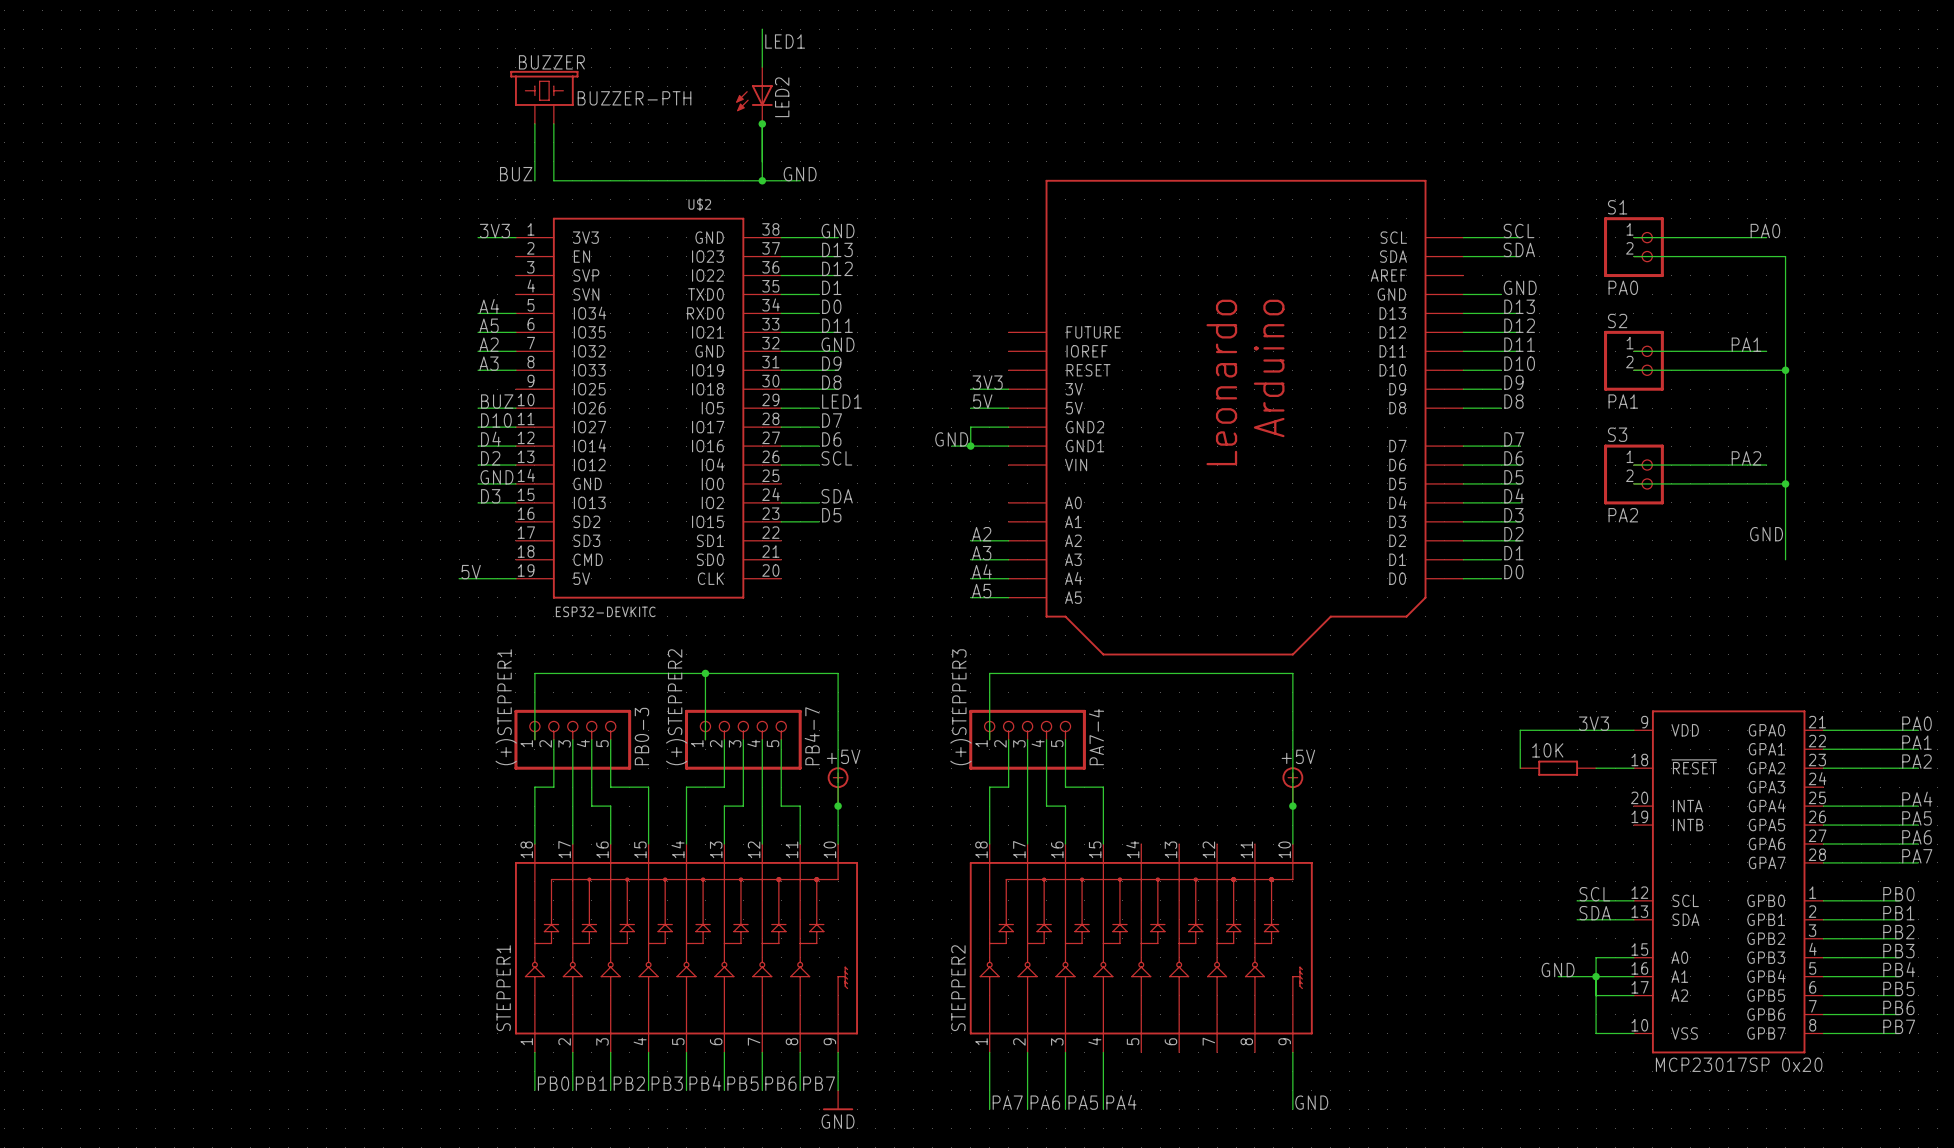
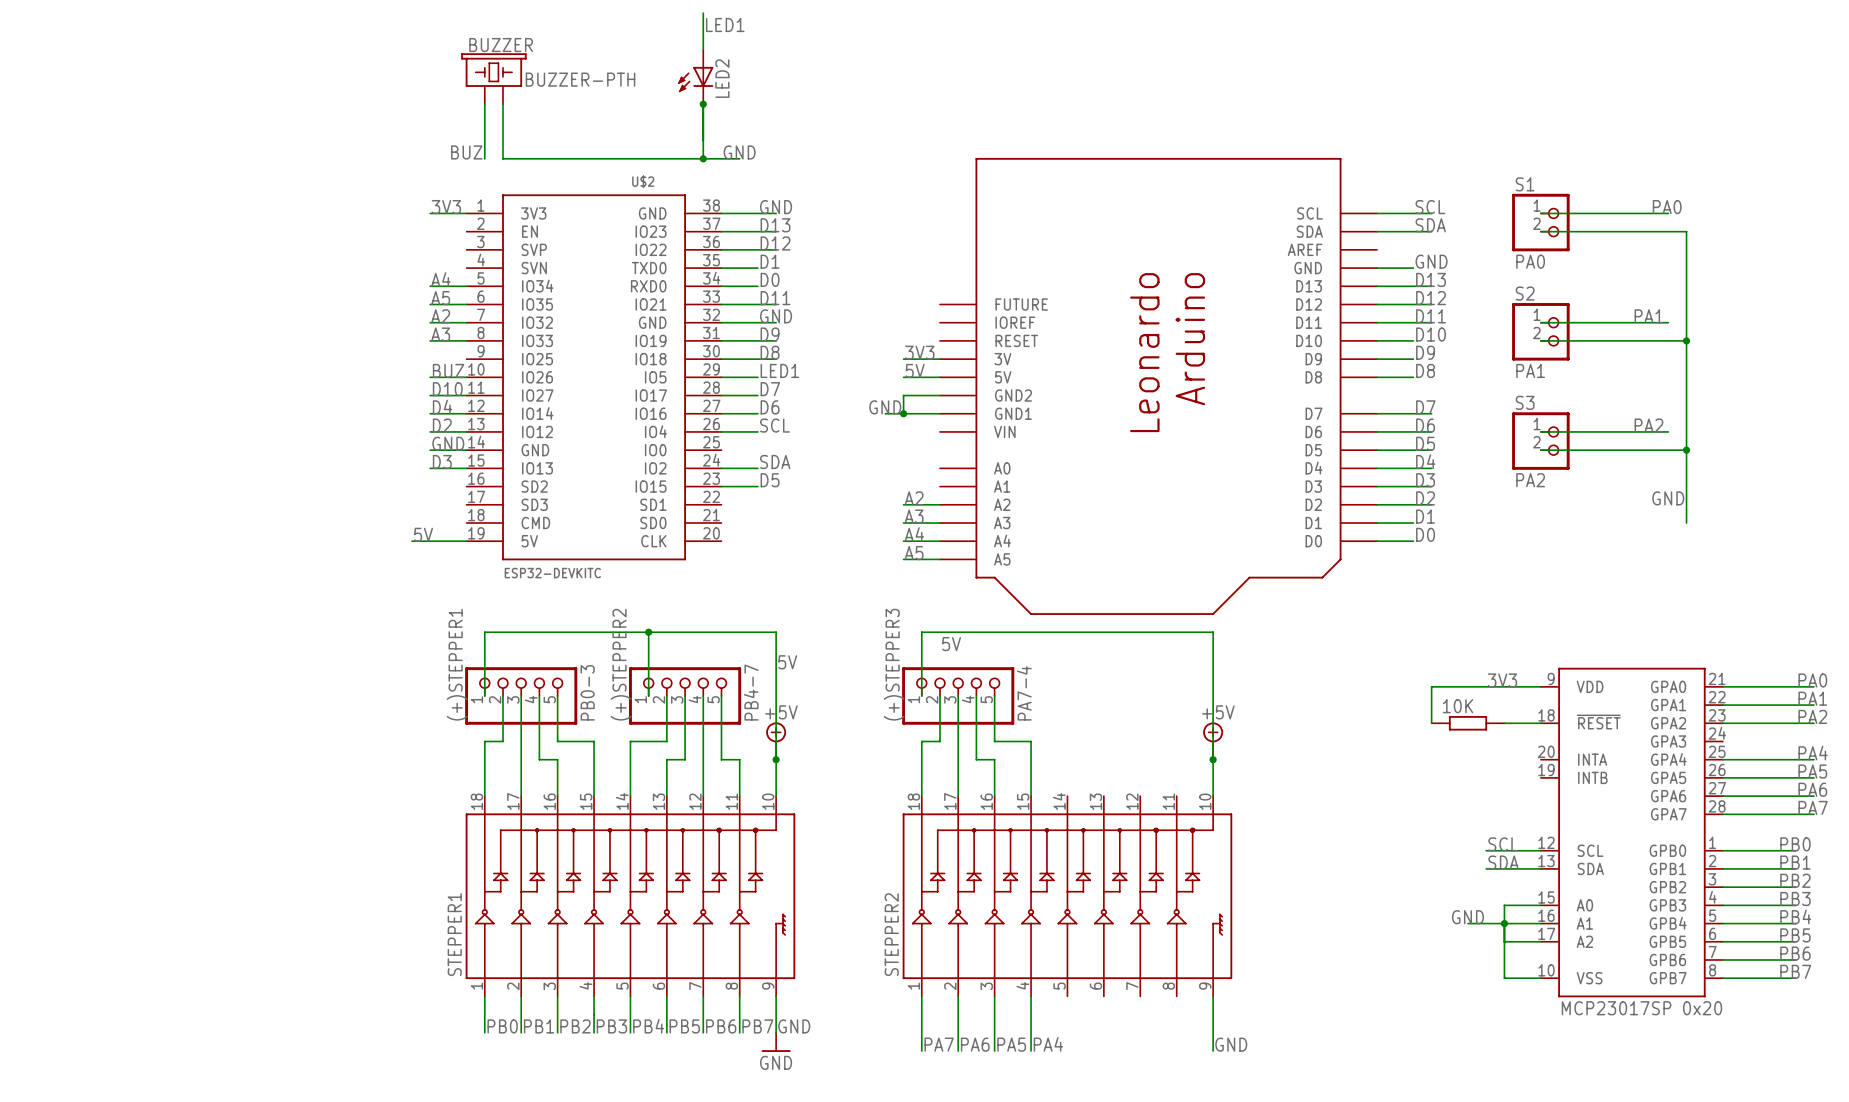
label: none -> 5V (951, 644)
label: none -> 5V (787, 662)
label: none -> GND (794, 1026)

